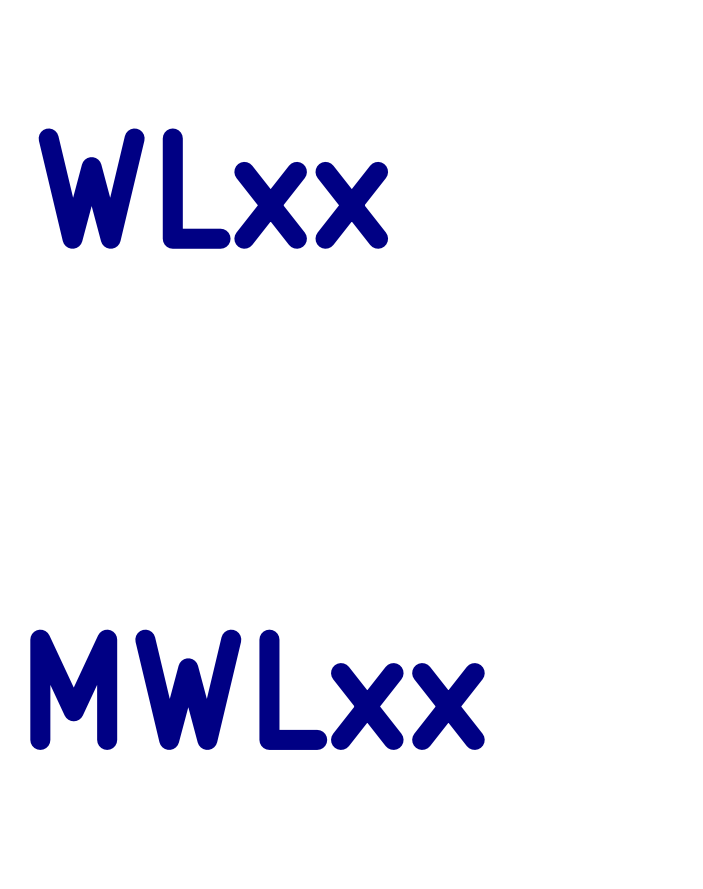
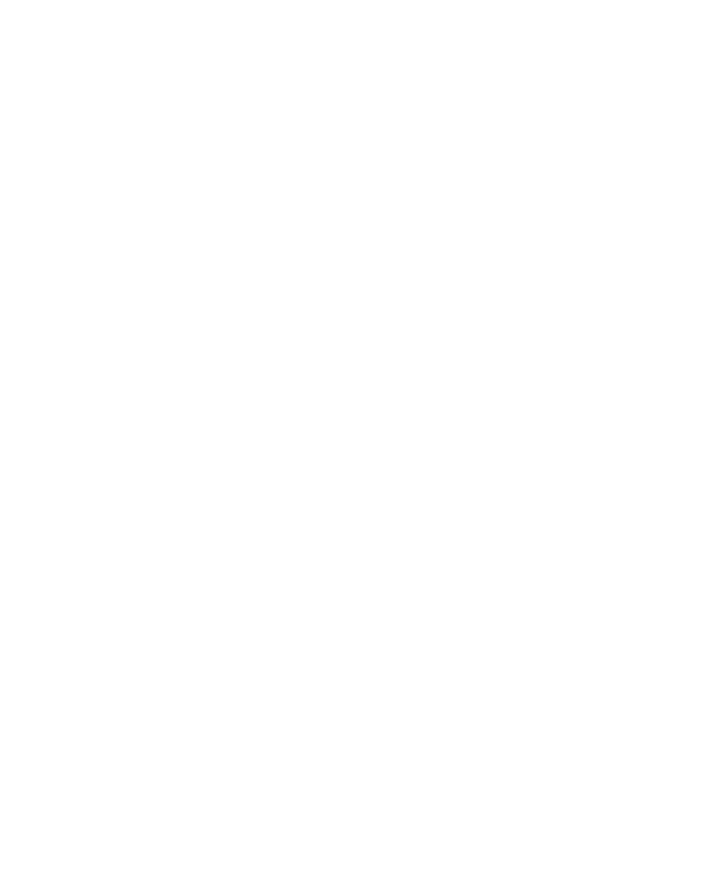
text: WLxx (213, 188) -> none
text: MWLxx (257, 689) -> none

